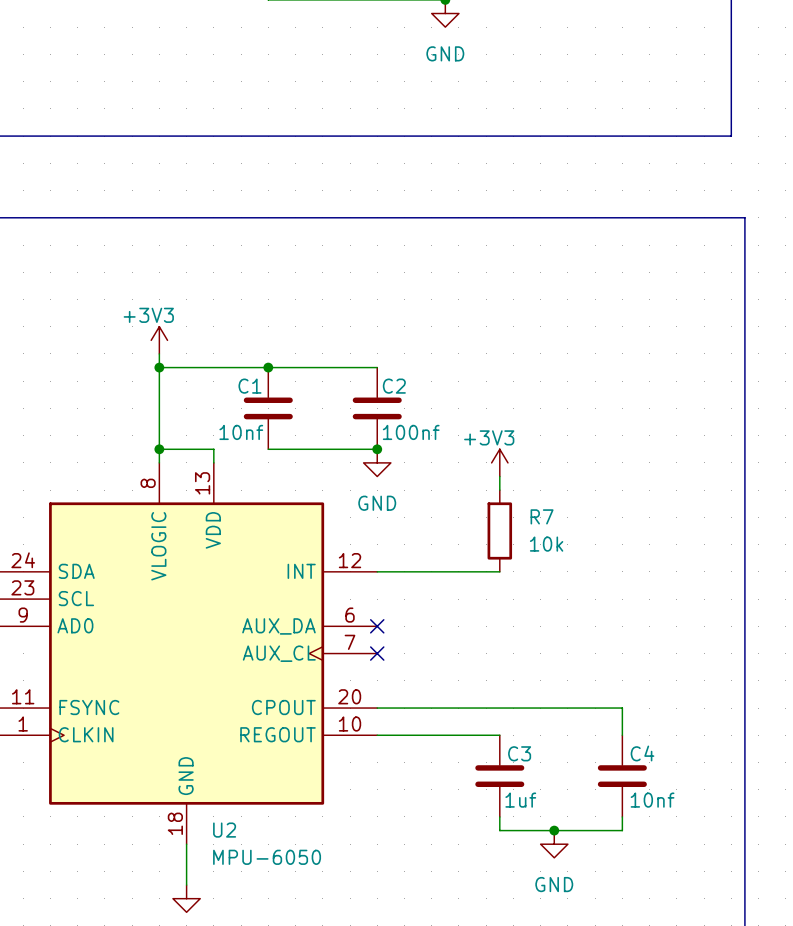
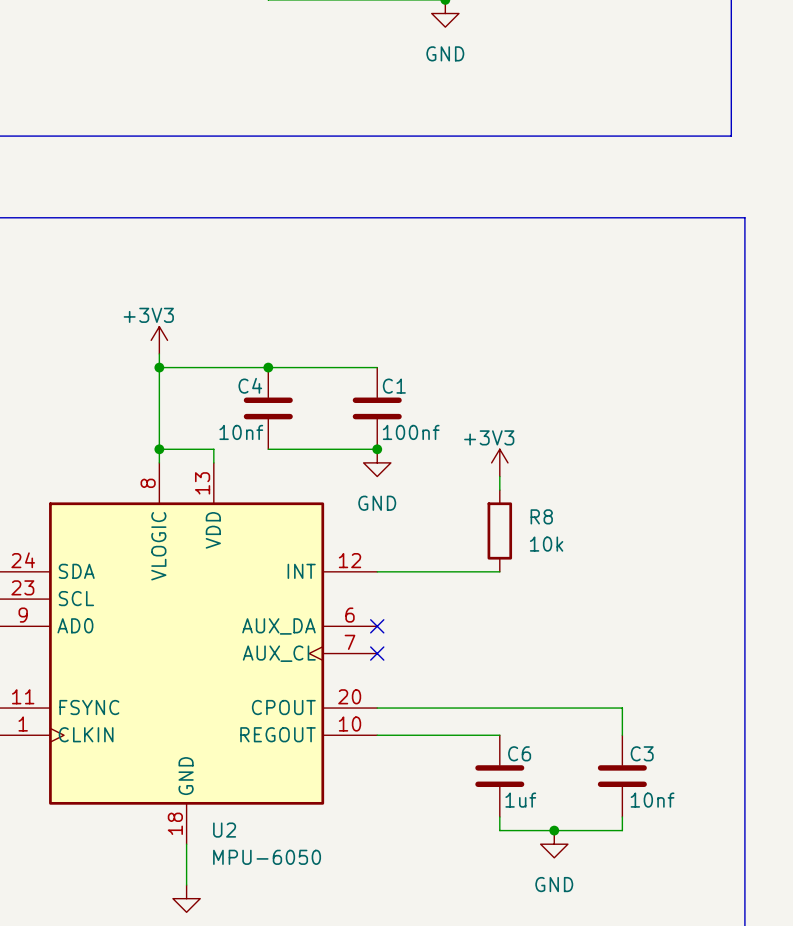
C1 name: C1 (249, 386) -> C4 (250, 385)
C2 name: C2 (394, 386) -> C1 (394, 386)
R7 name: R7 (542, 516) -> R8 (541, 516)
C3 name: C3 (519, 753) -> C6 (519, 753)
C4 name: C4 (642, 753) -> C3 (642, 753)

